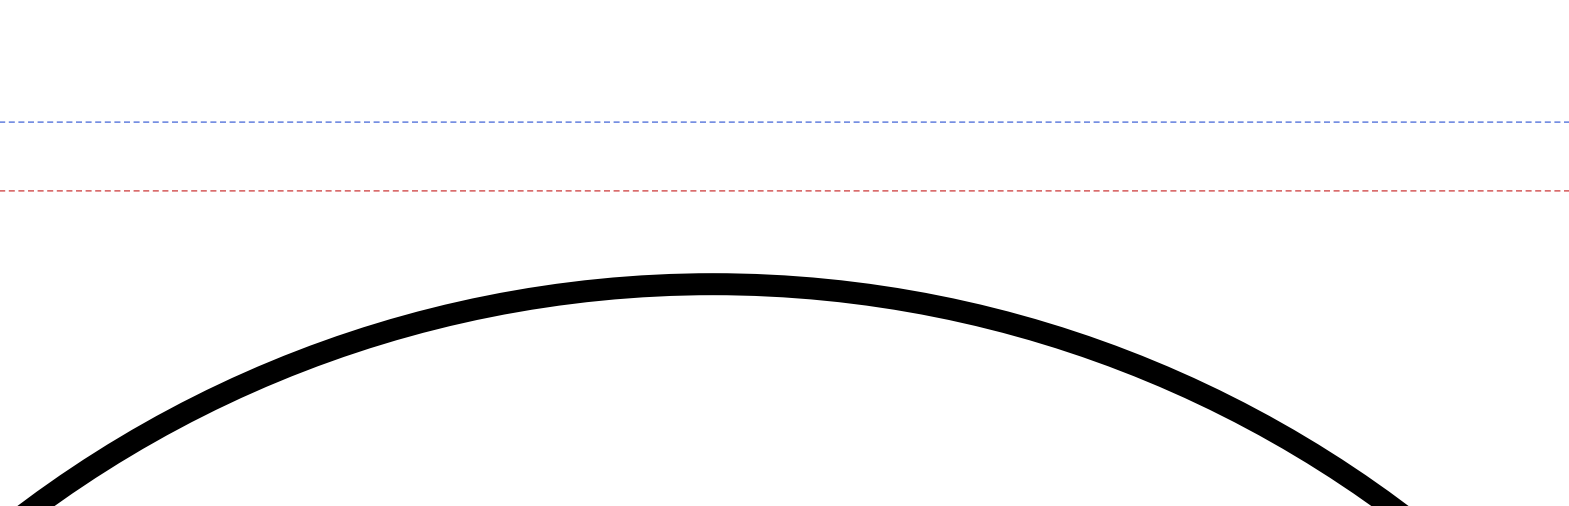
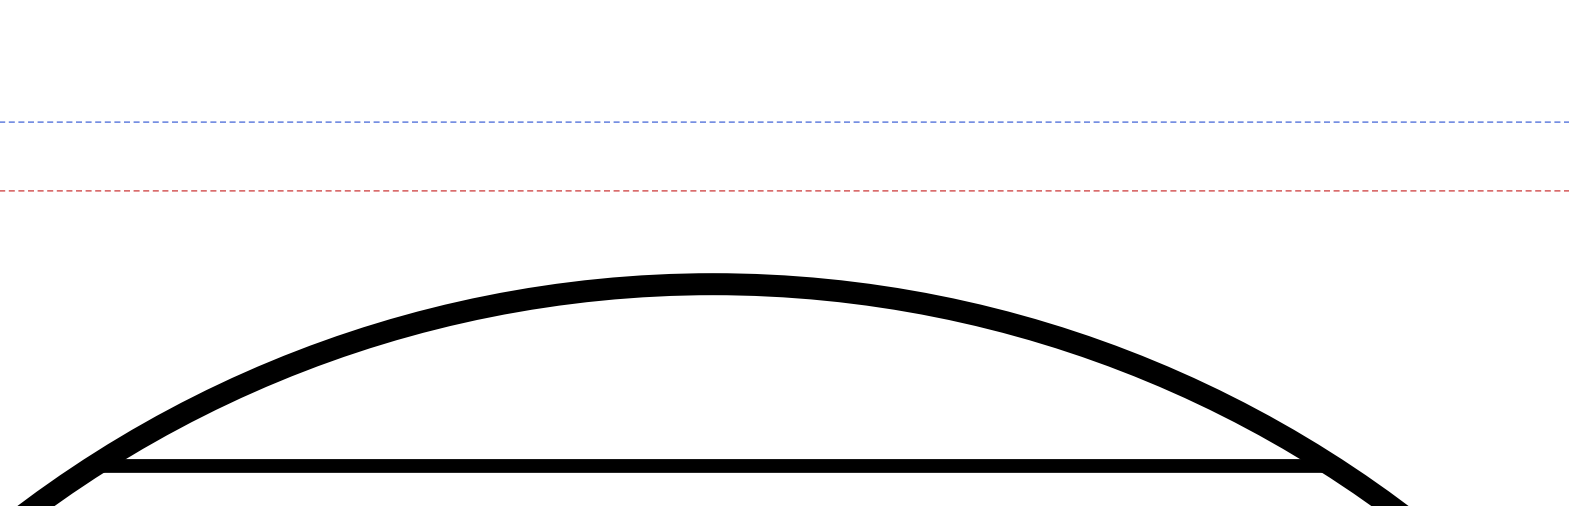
board edge: none -> (1331, 465) (94, 465)

